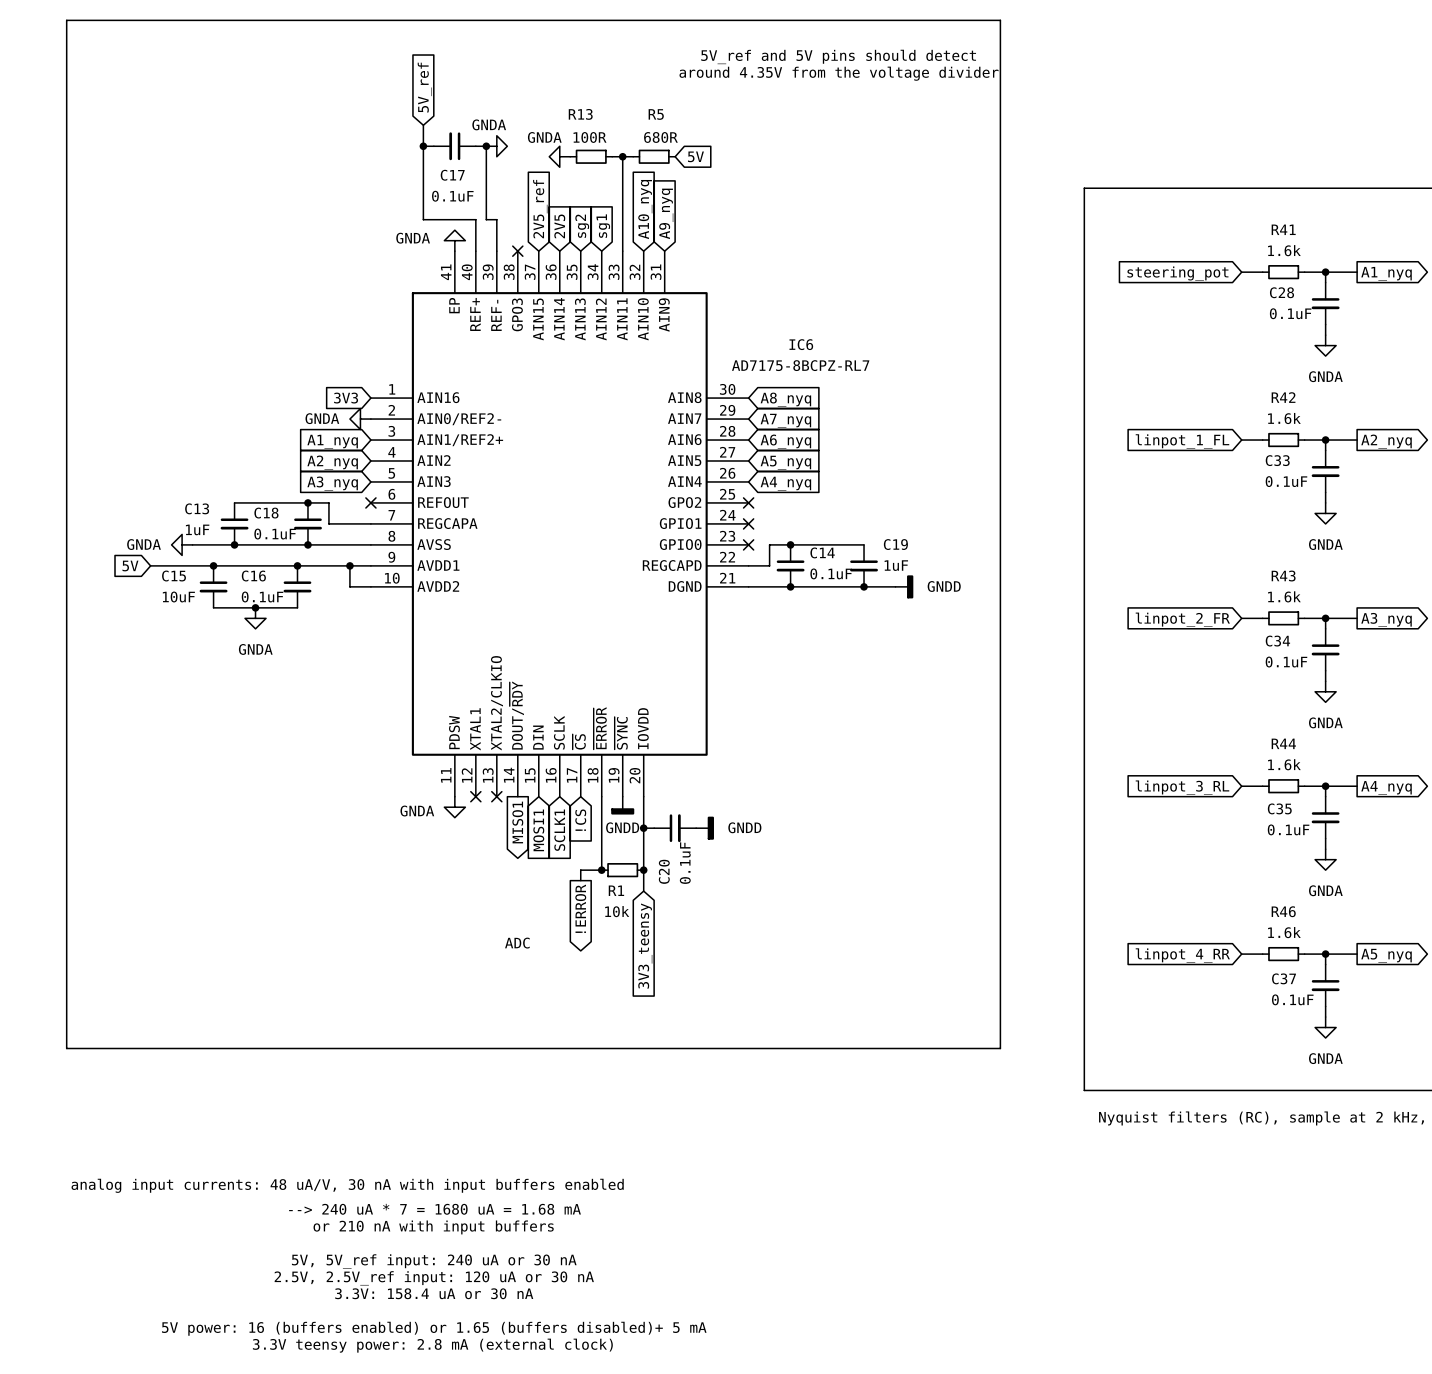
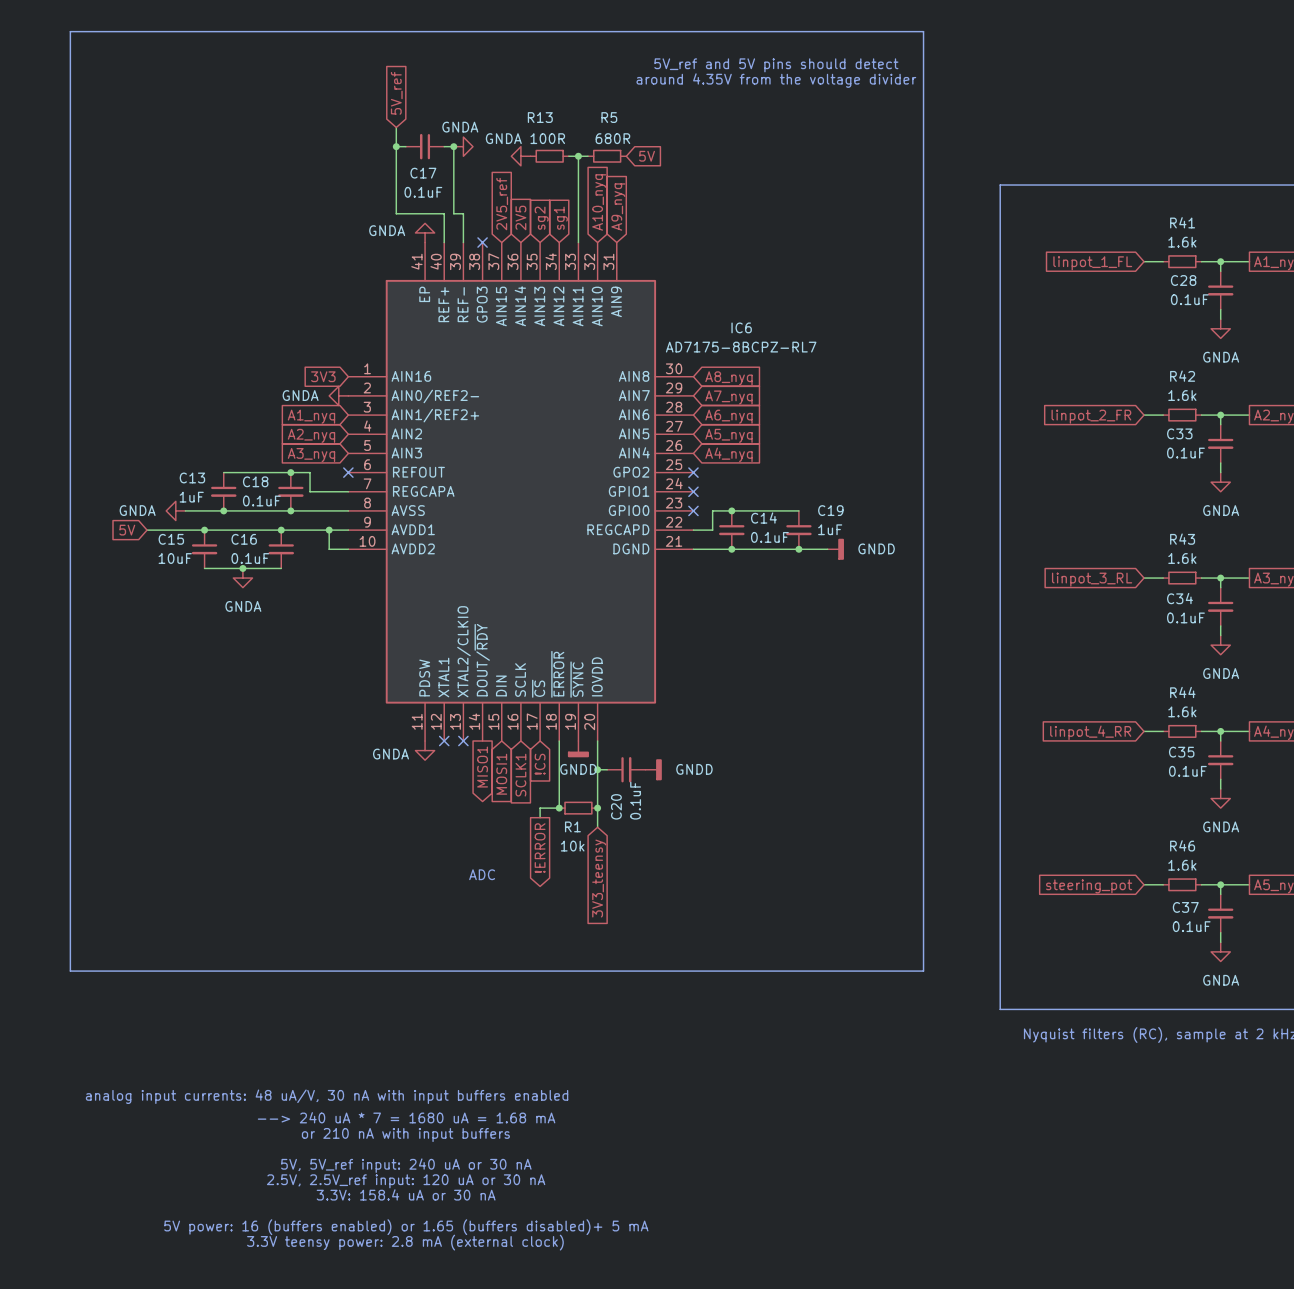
global label: steering_pot (1177, 273) -> linpot_1_FL (1092, 263)
global label: linpot_1_FL (1182, 441) -> linpot_2_FR (1091, 416)
global label: linpot_2_FR (1182, 619) -> linpot_3_RL (1092, 579)
global label: linpot_3_RL (1182, 787) -> linpot_4_RR (1090, 732)
global label: linpot_4_RR (1182, 955) -> steering_pot (1089, 886)

